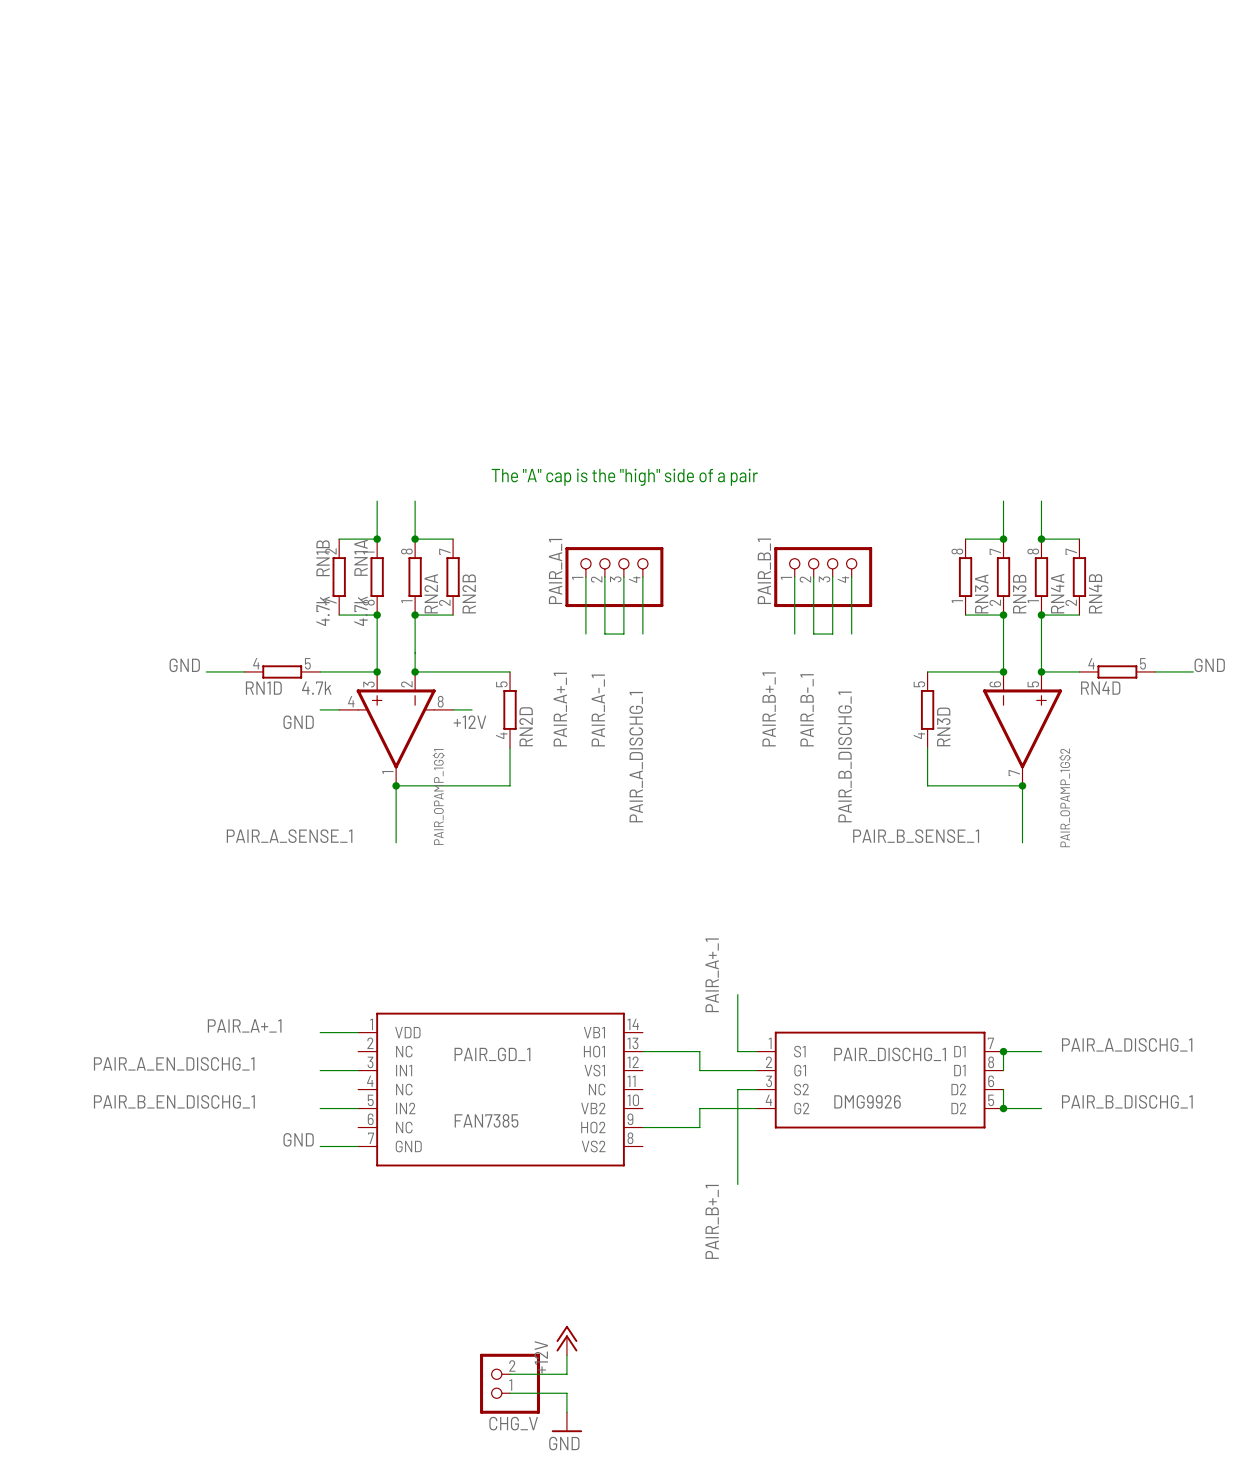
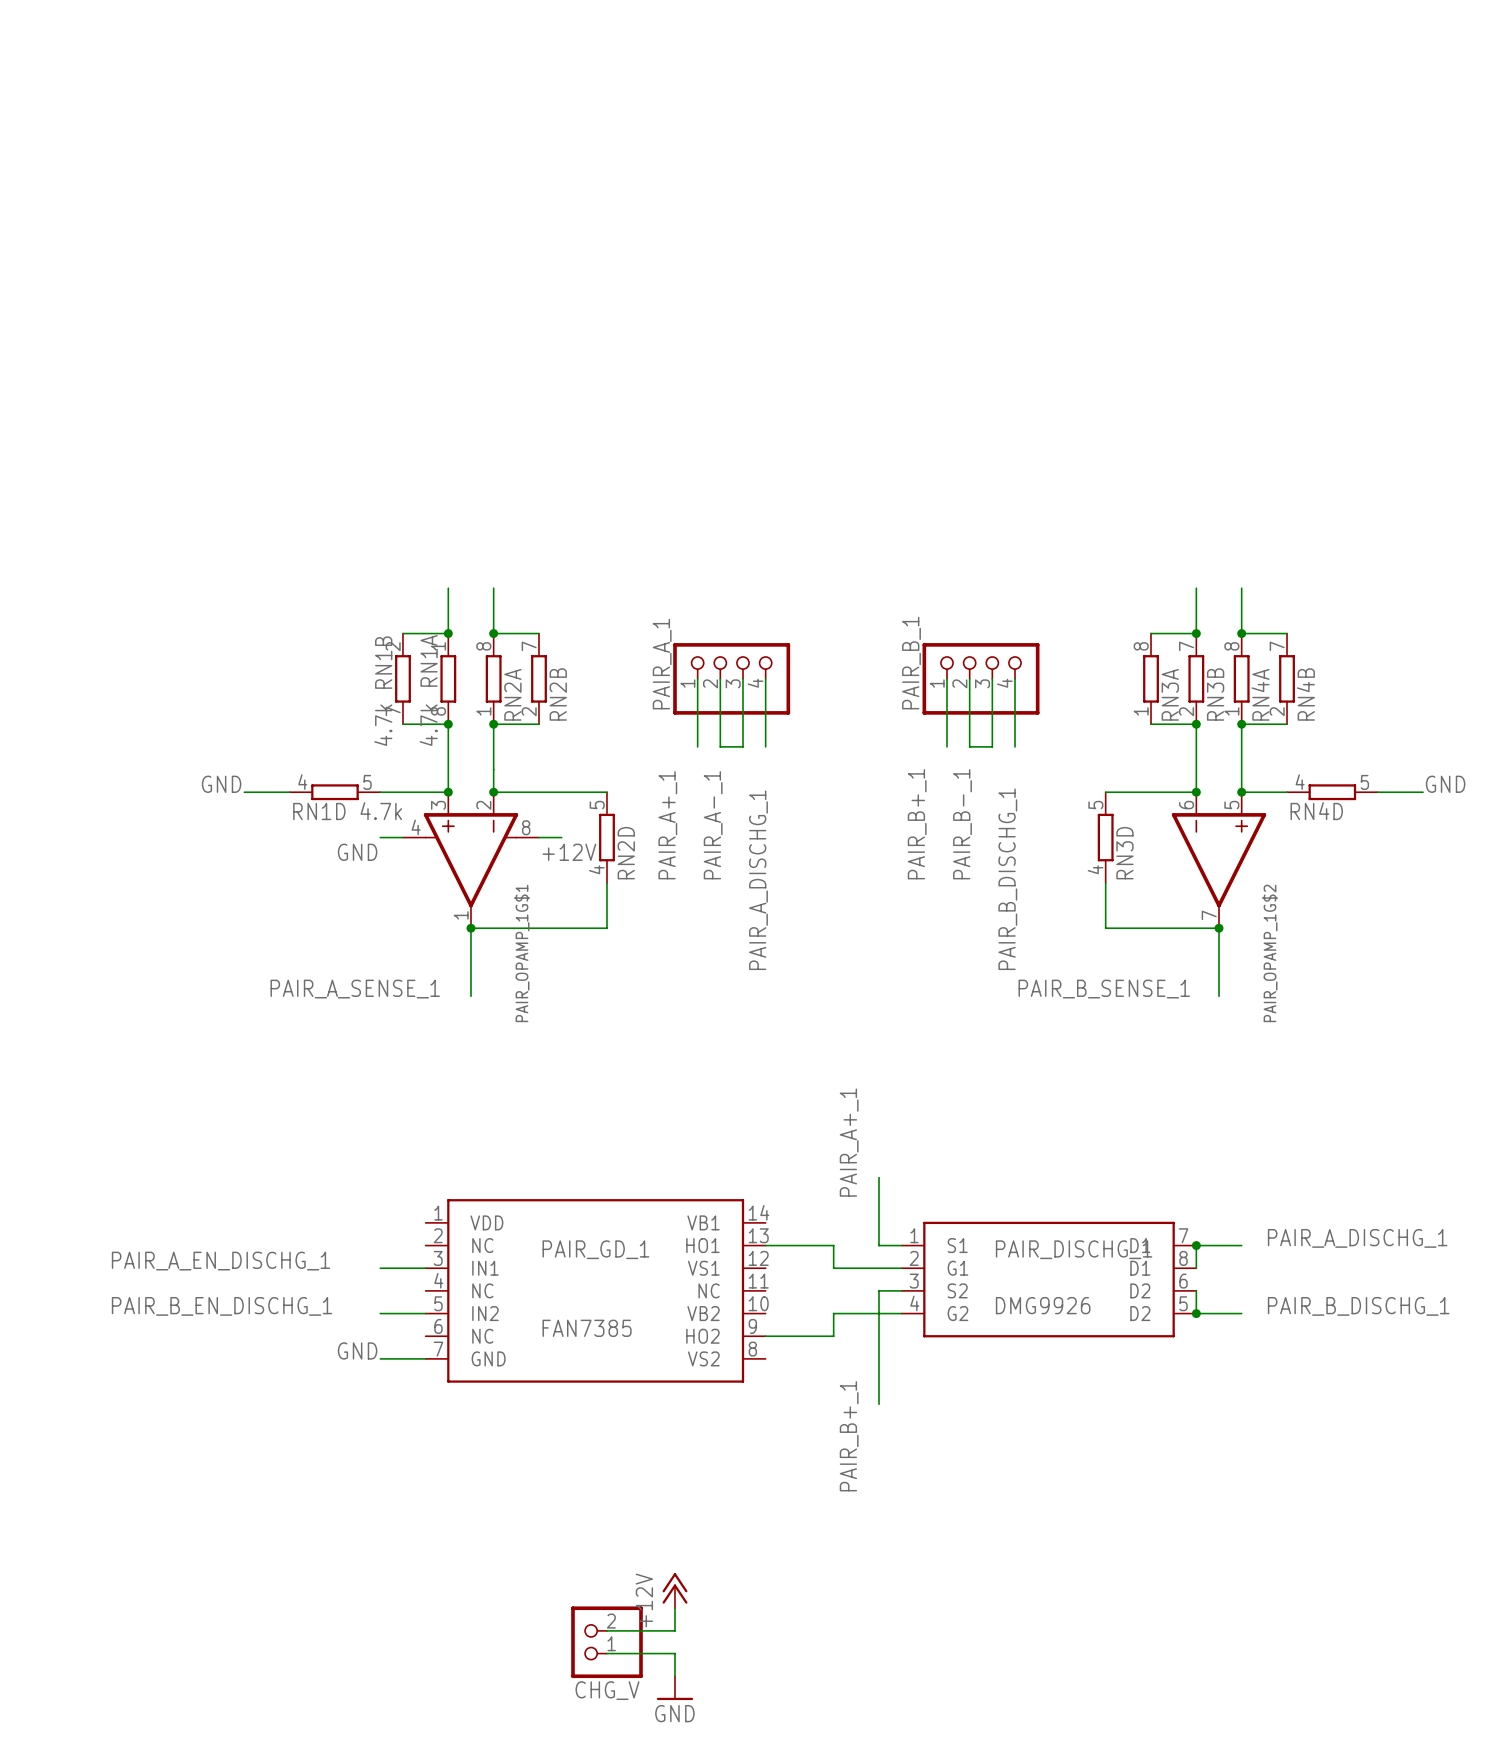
text: The "A" cap is the "high" side of a pair (624, 477) -> none
label: PAIR_A+_1 (244, 1025) -> none
wire: (320, 1032) (358, 1032) -> none

